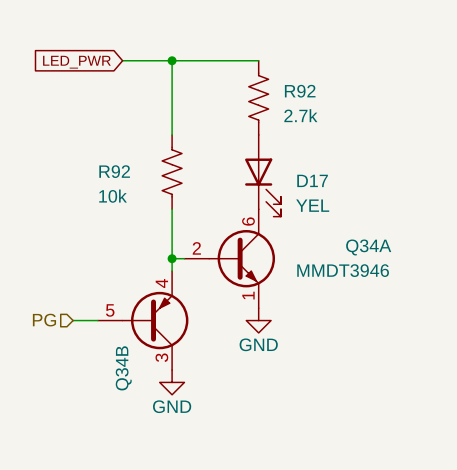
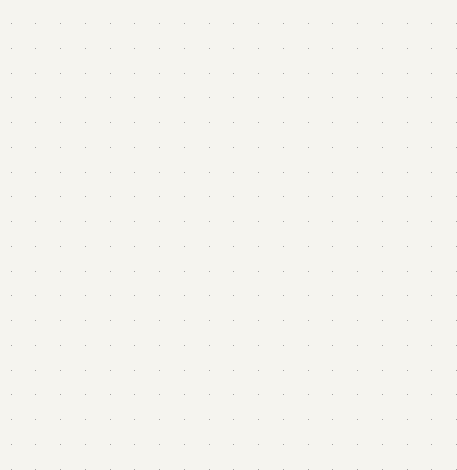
wire: (122, 60) (258, 60) -> none
wire: (172, 60) (172, 134) -> none
junction: (172, 60) -> none
global label: LED_PWR (76, 62) -> none
R92: 2.7k (258, 97) -> none
R92: 10k (172, 172) -> none
D17: YEL (263, 175) -> none
wire: (172, 209) (172, 271) -> none
wire: (172, 258) (184, 258) -> none
junction: (172, 258) -> none
Q34A: MMDT3946 (229, 258) -> none
hierarchical label: PG (44, 320) -> none
wire: (73, 320) (97, 320) -> none
Q34B: (143, 320) -> none
power symbol: GND (258, 320) -> none
power symbol: GND (172, 382) -> none

